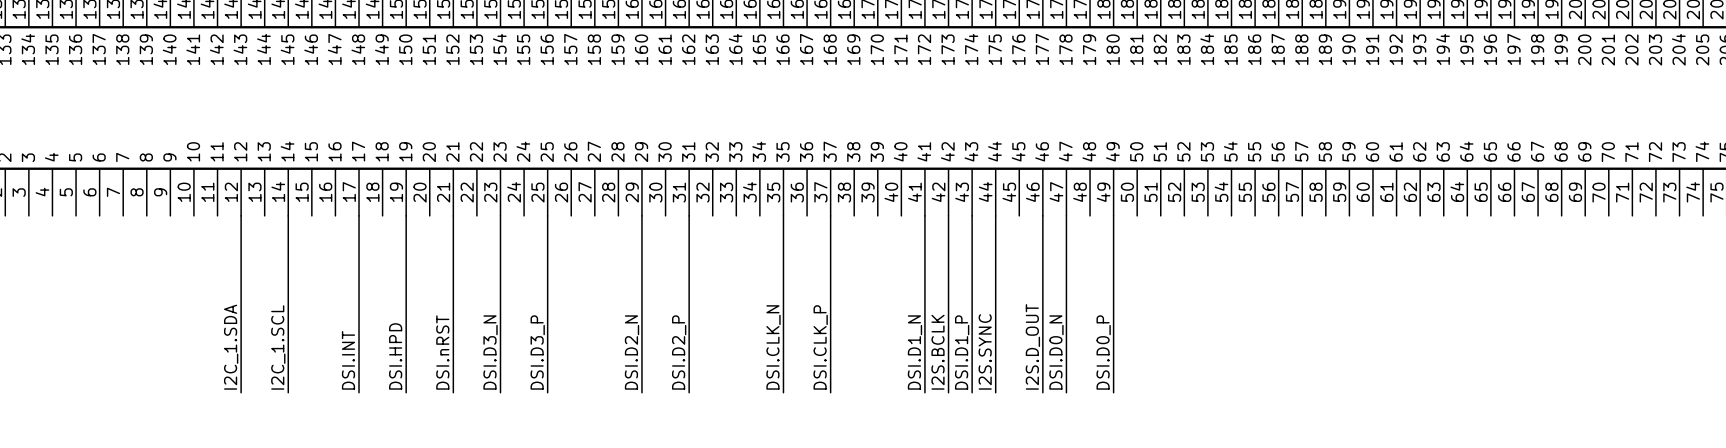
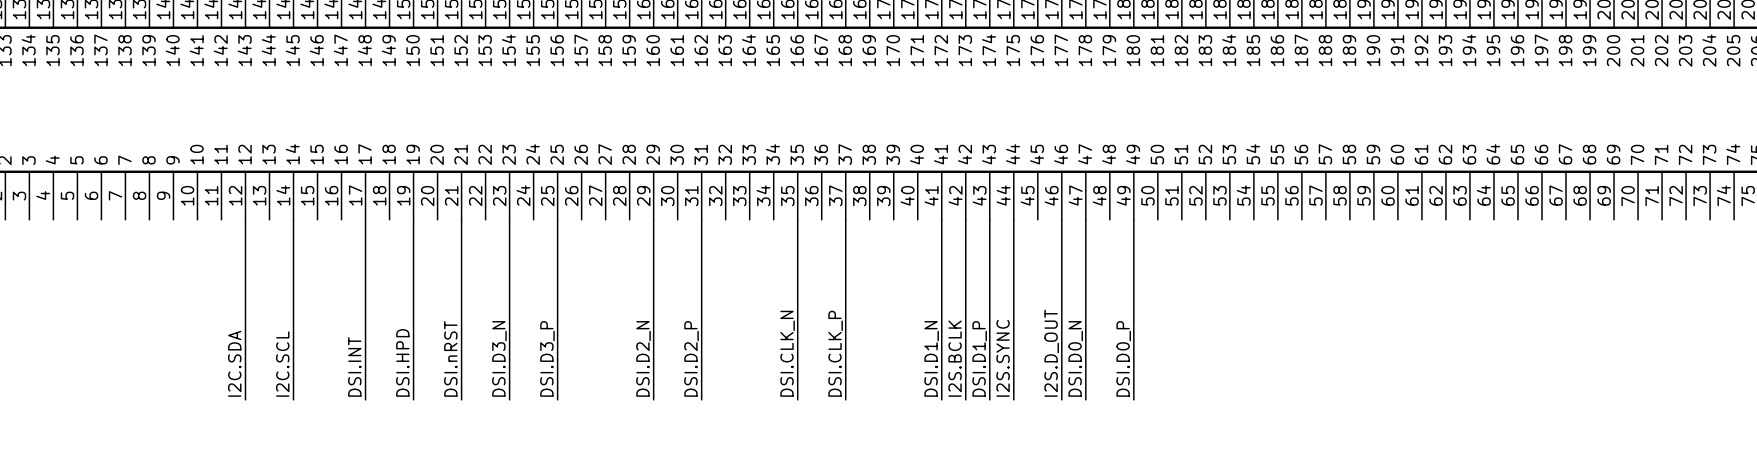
label: I2C_1.SDA (231, 347) -> I2C.SDA (234, 363)
label: I2C_1.SCL (278, 347) -> I2C.SCL (282, 364)

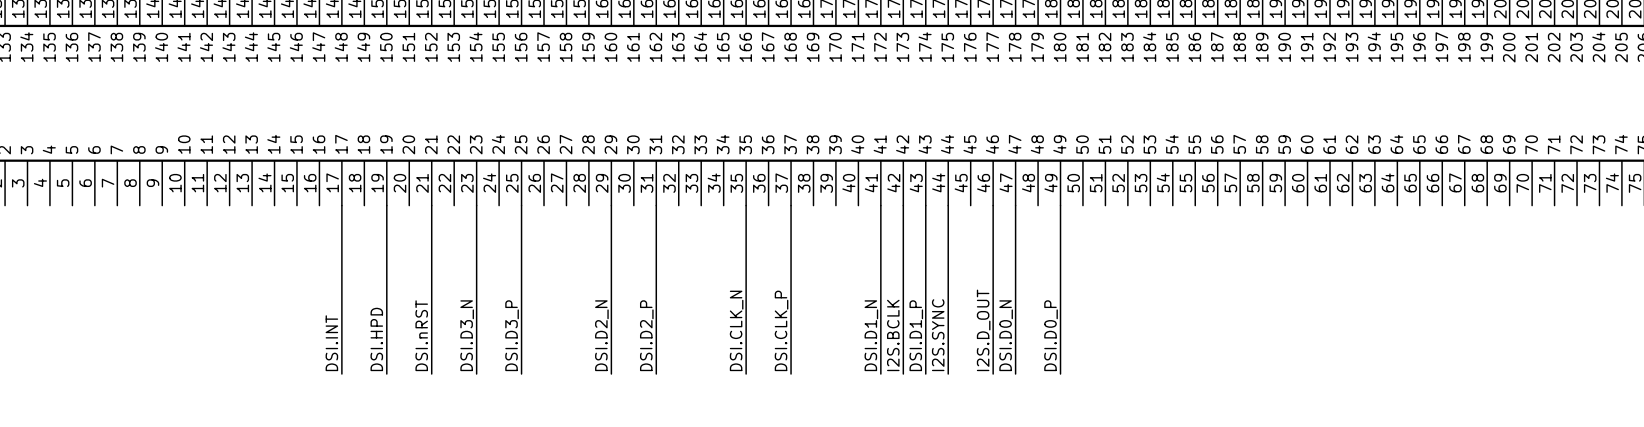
wire: (245, 219) (245, 399) -> none
wire: (293, 219) (293, 399) -> none
label: I2C.SDA (234, 363) -> none
label: I2C.SCL (282, 364) -> none

